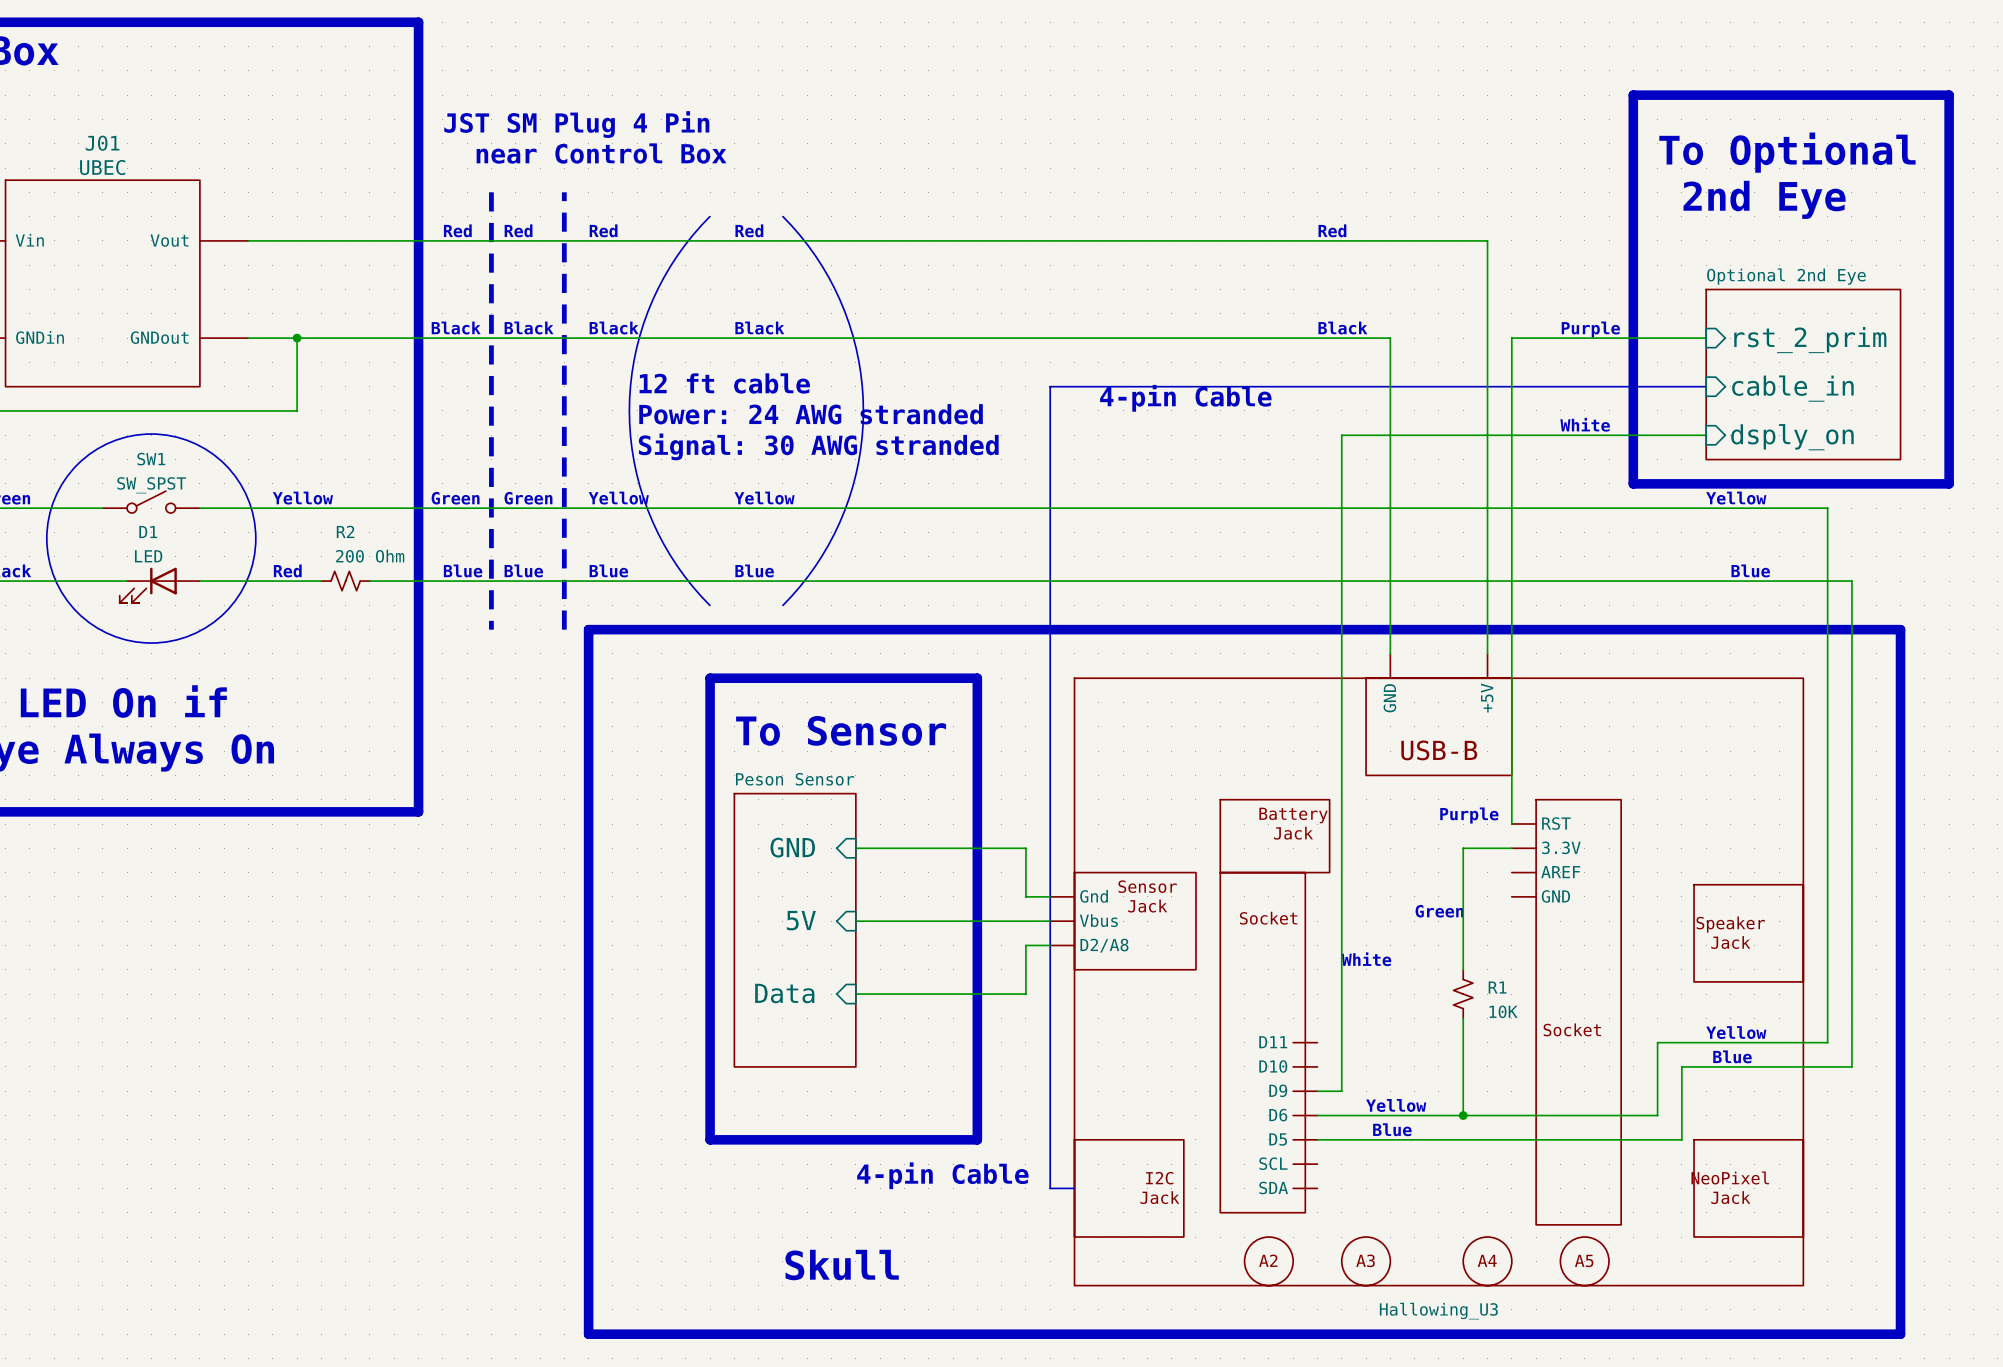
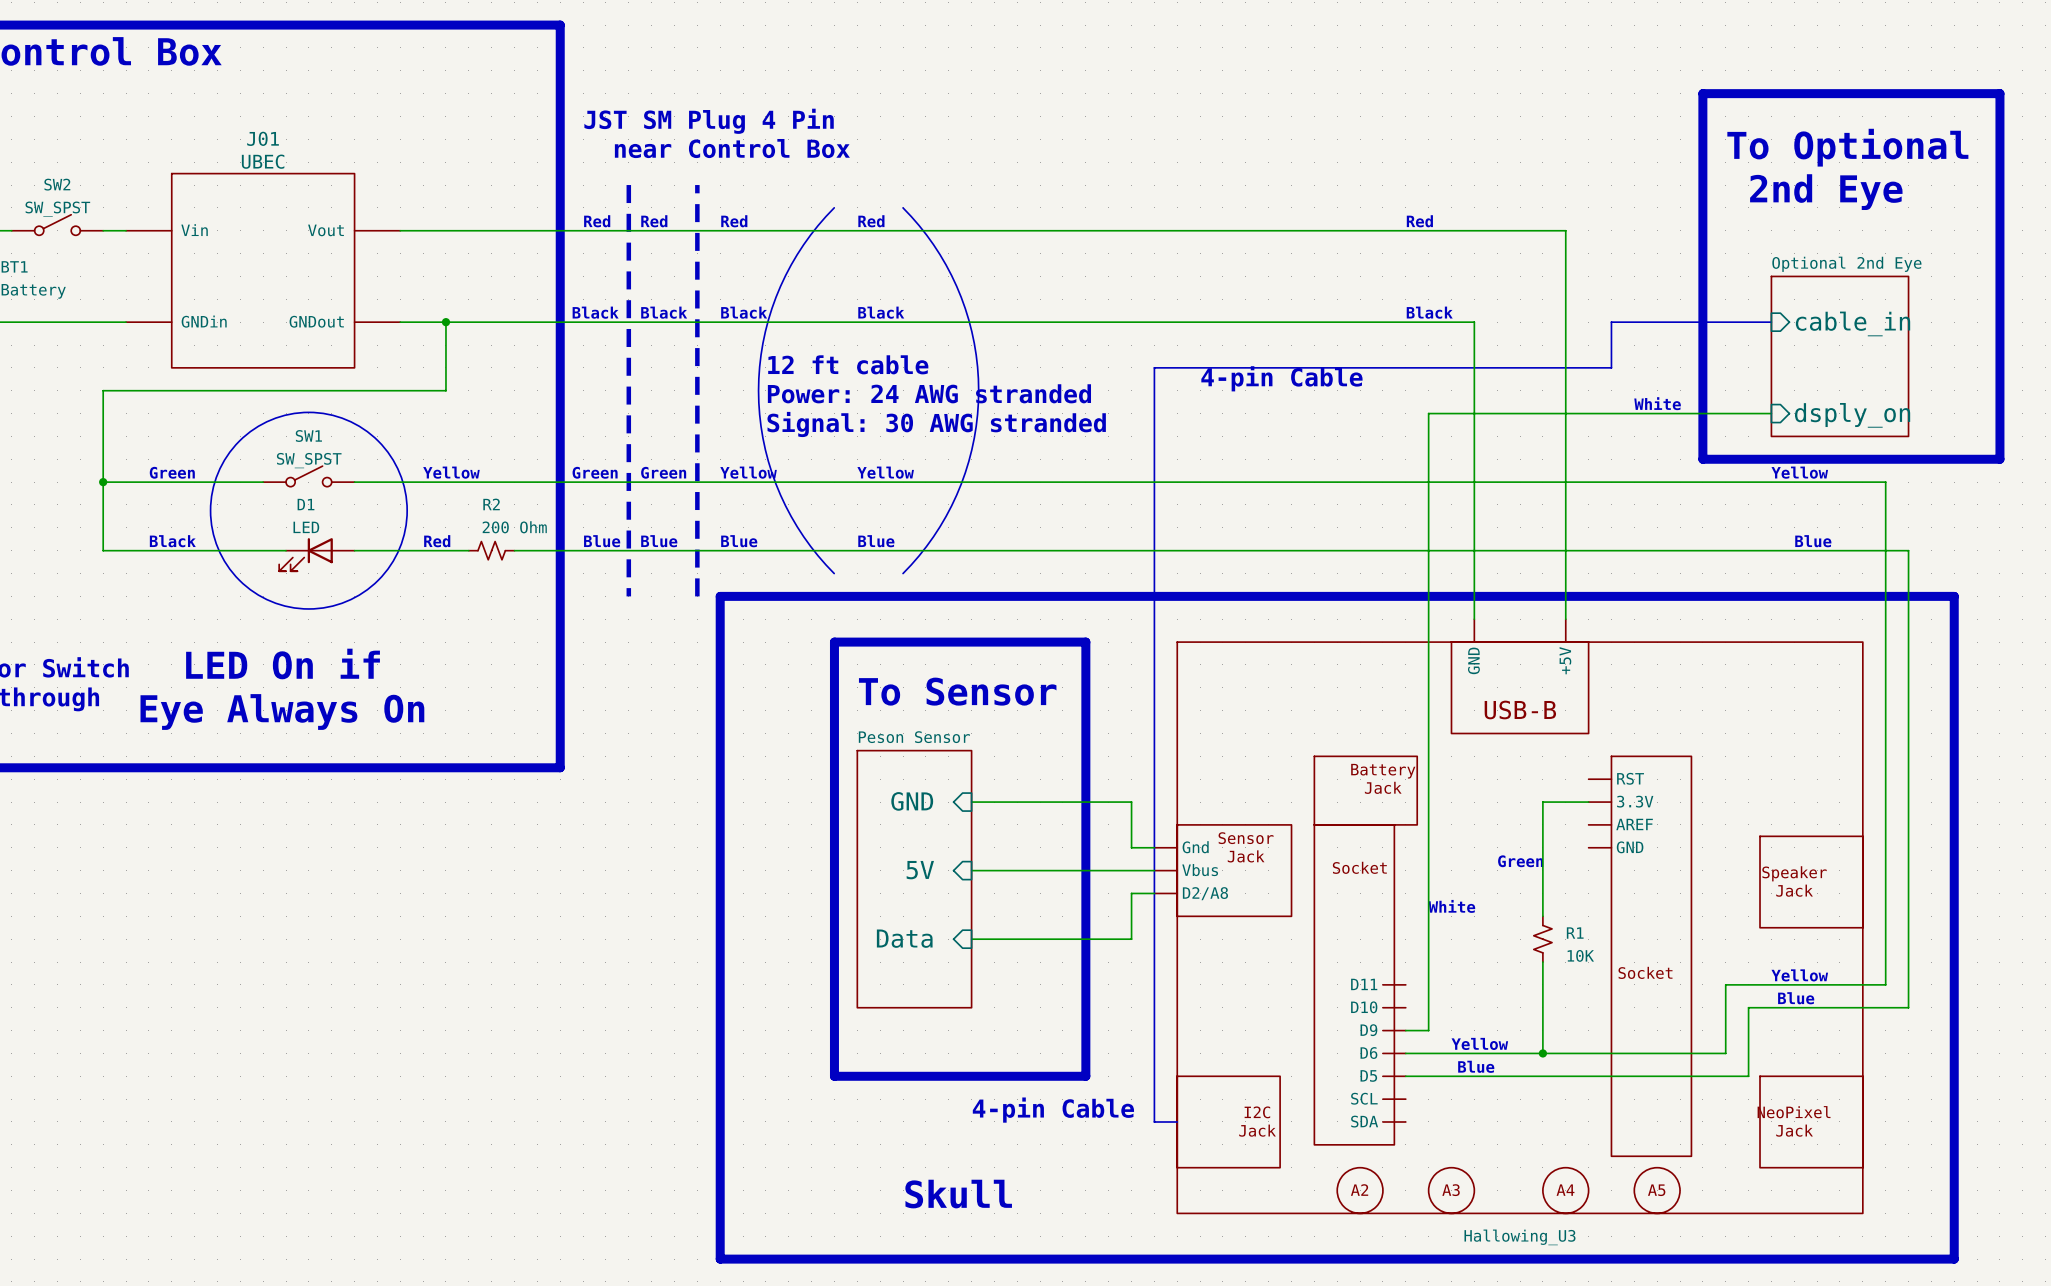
sheet Optional 2nd Eye shape: [1705, 288, 1902, 461] -> [1770, 275, 1910, 438]
text: Purple (1590, 329) -> none
wire: (1706, 338) (1511, 338) (1511, 824) -> none
sheet pin: rst_2_prim (1810, 340) -> cable_in (1853, 323)
bus: (1536, 386) (1706, 386) -> (1611, 367) (1611, 322) (1771, 322)
sheet pin: cable_in (1792, 388) -> none
text: Purple (1469, 815) -> none

